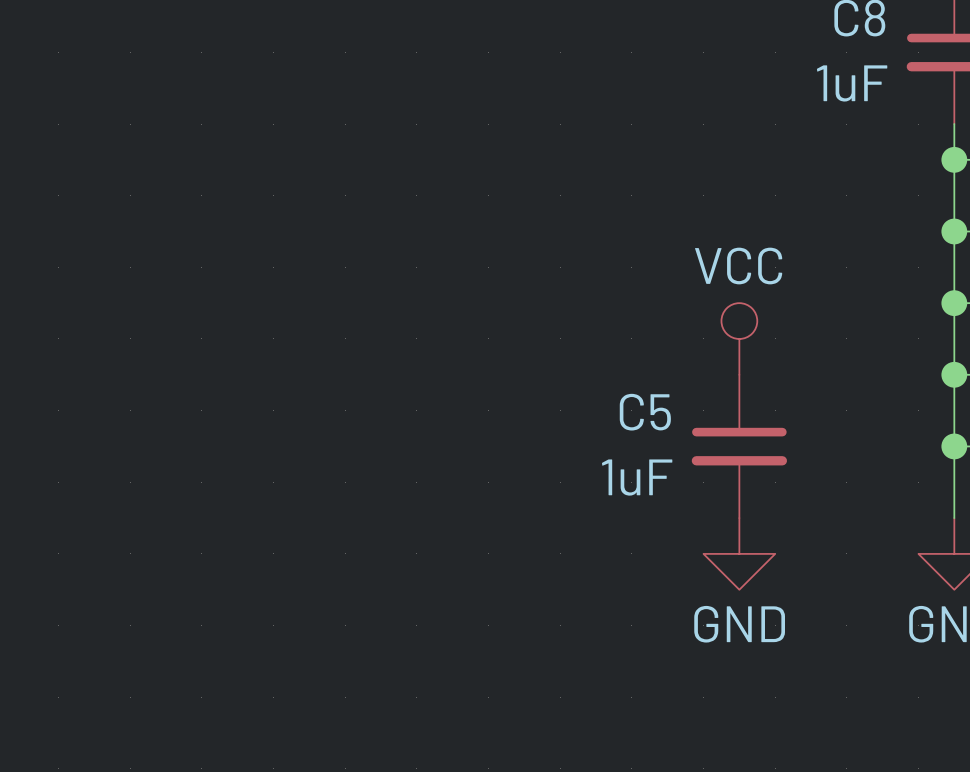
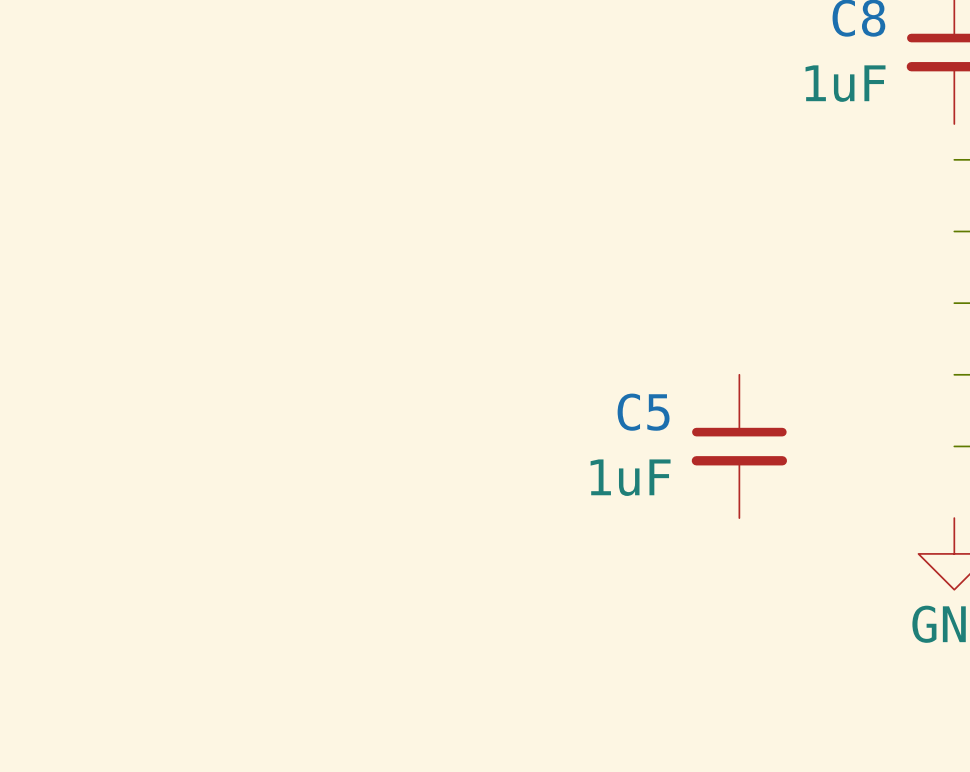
wire: (954, 124) (954, 518) -> none
junction: (954, 159) -> none
junction: (954, 231) -> none
junction: (954, 303) -> none
power symbol: VCC (739, 338) -> none
junction: (954, 374) -> none
junction: (954, 446) -> none
power symbol: GND (739, 553) -> none

